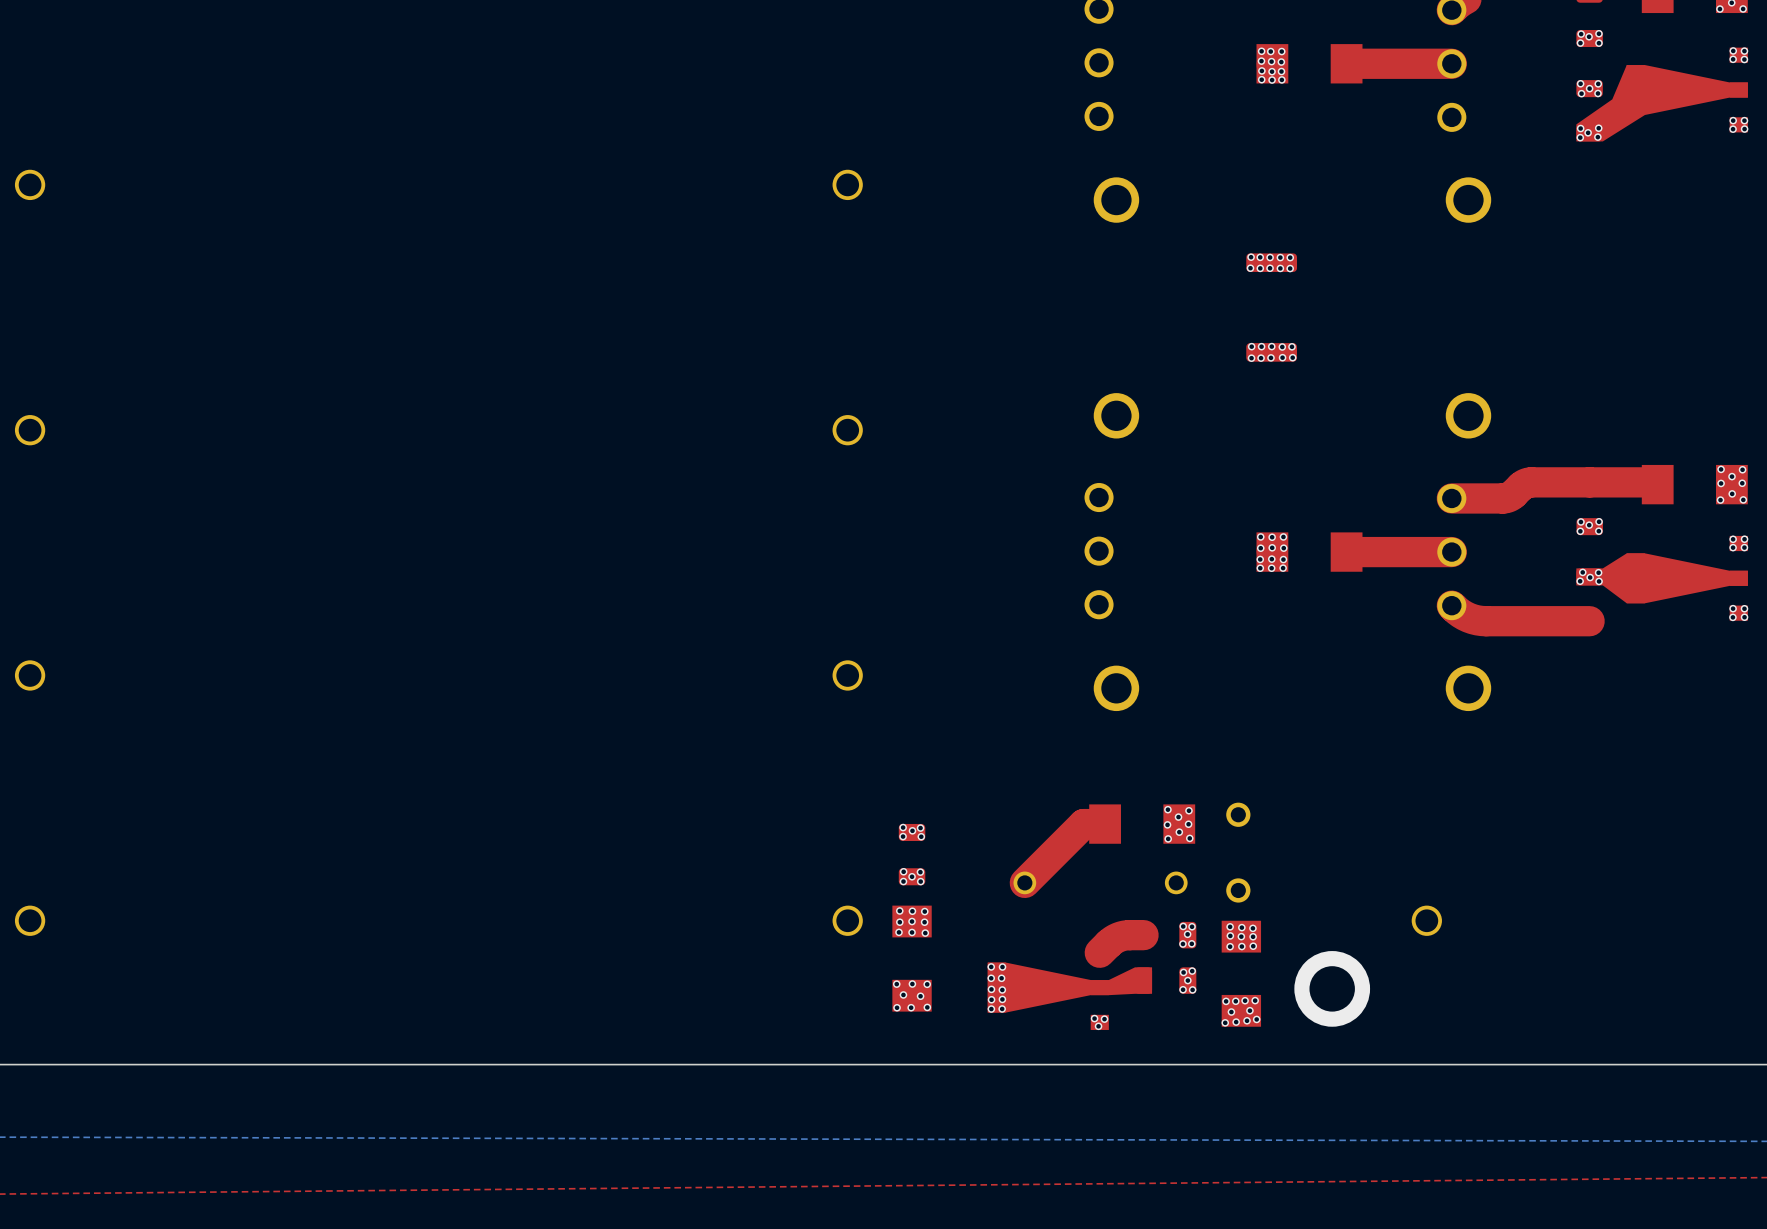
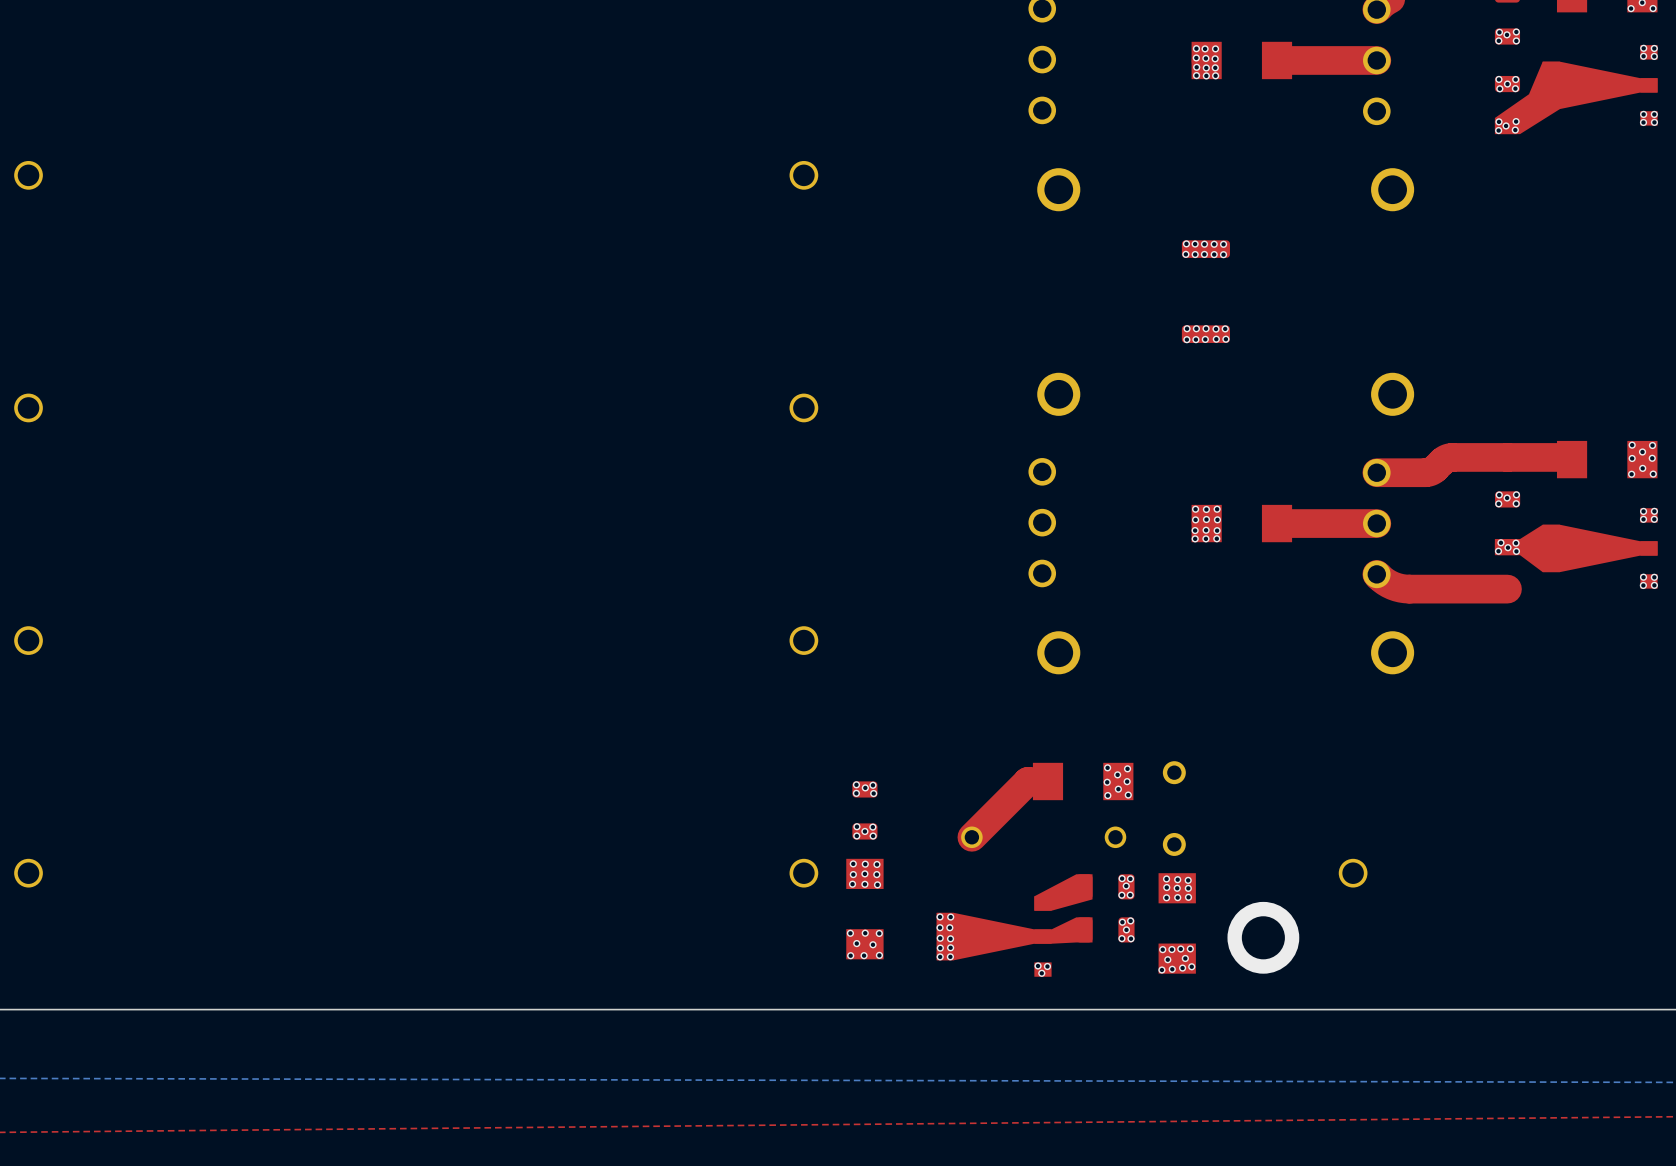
drawing: none -> [1034, 874, 1093, 911]
top track: (1143, 935) (1118, 937) (1099, 952) -> none

